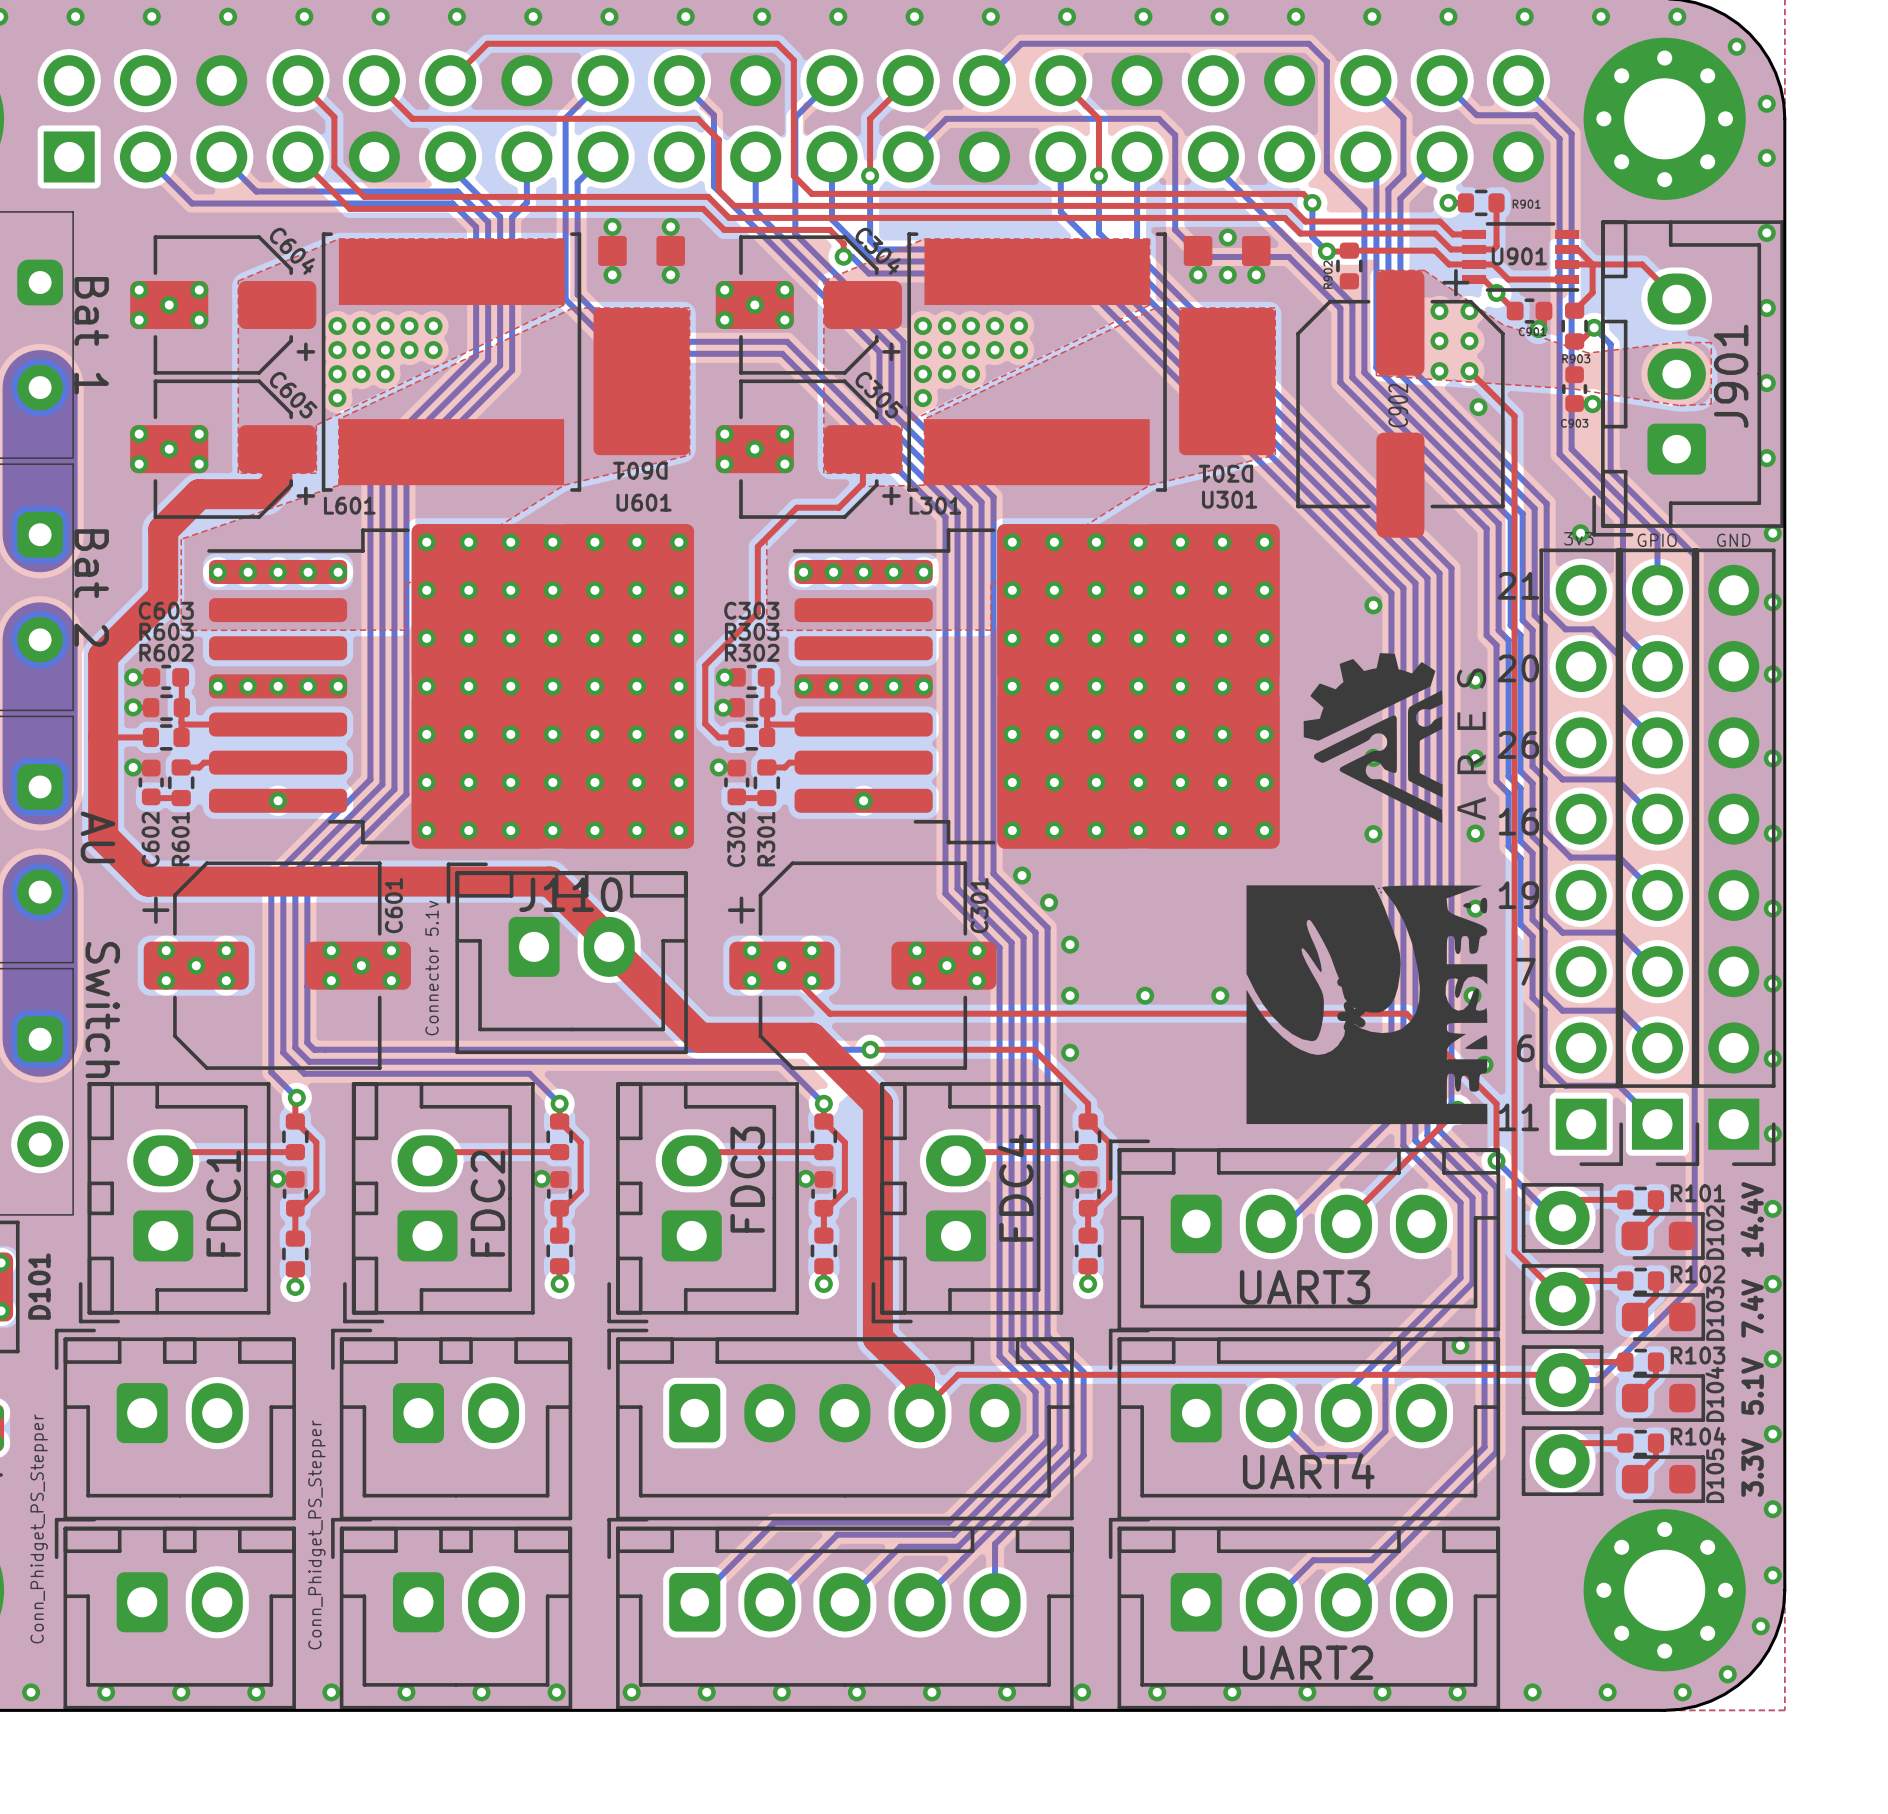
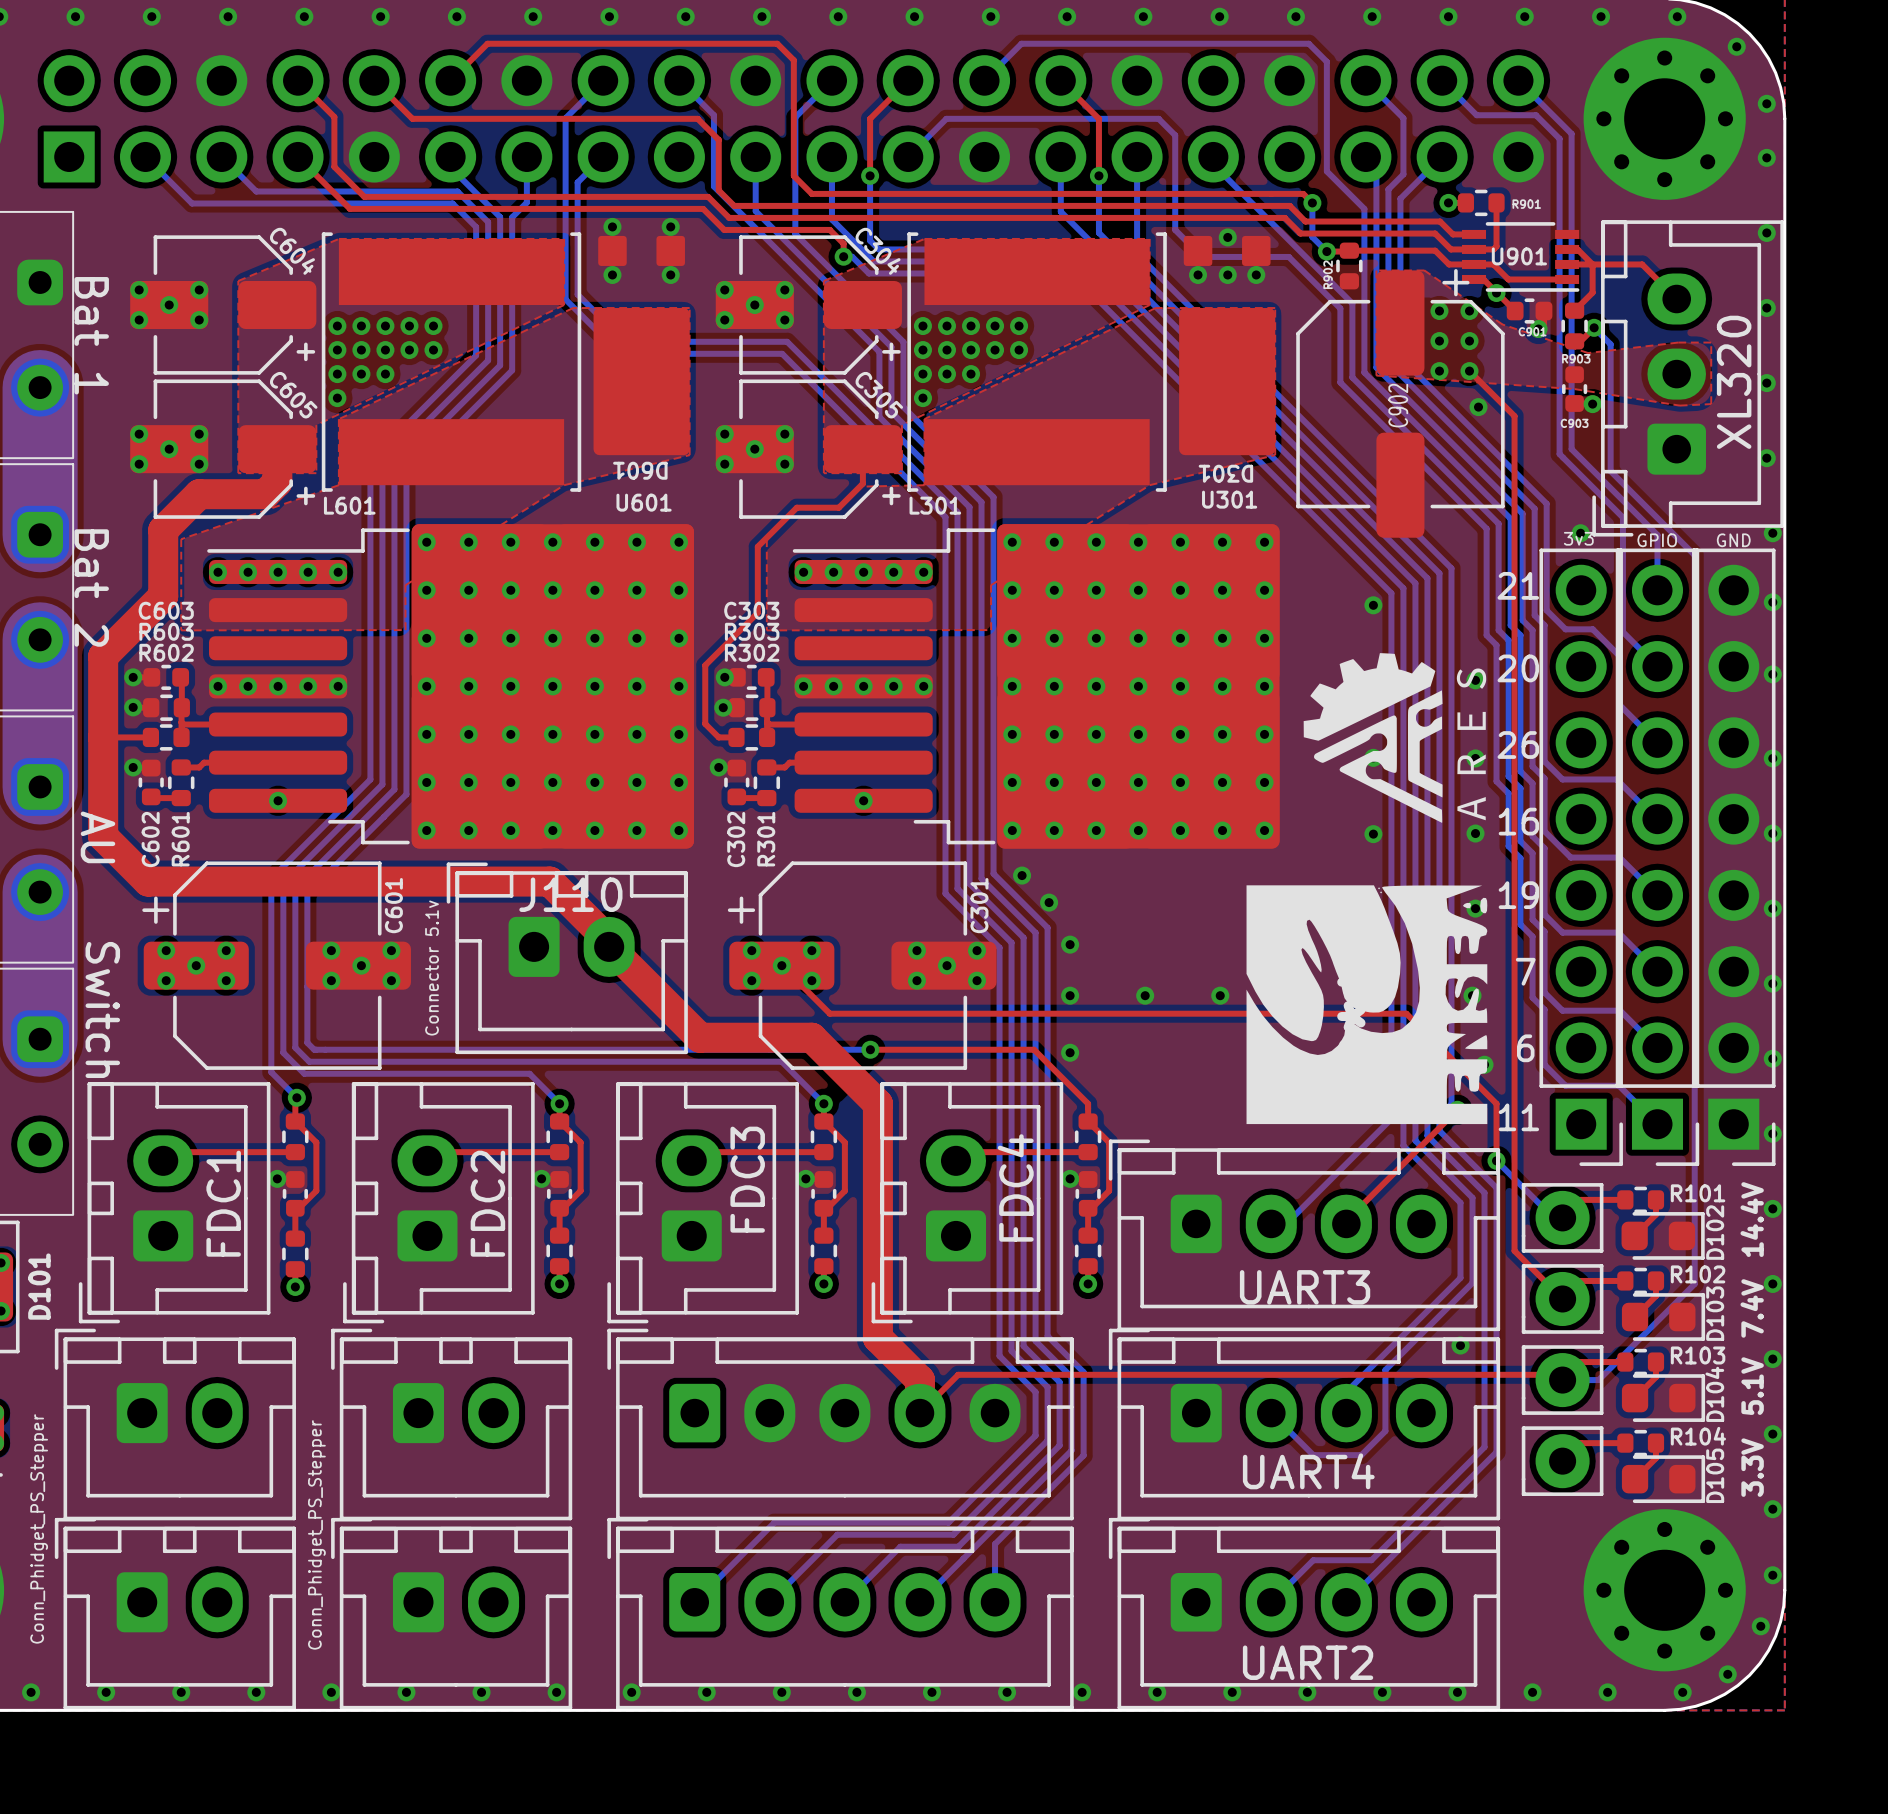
J901 name: J901 (1731, 376) -> none
J901 text: none -> XL320 (1734, 382)

